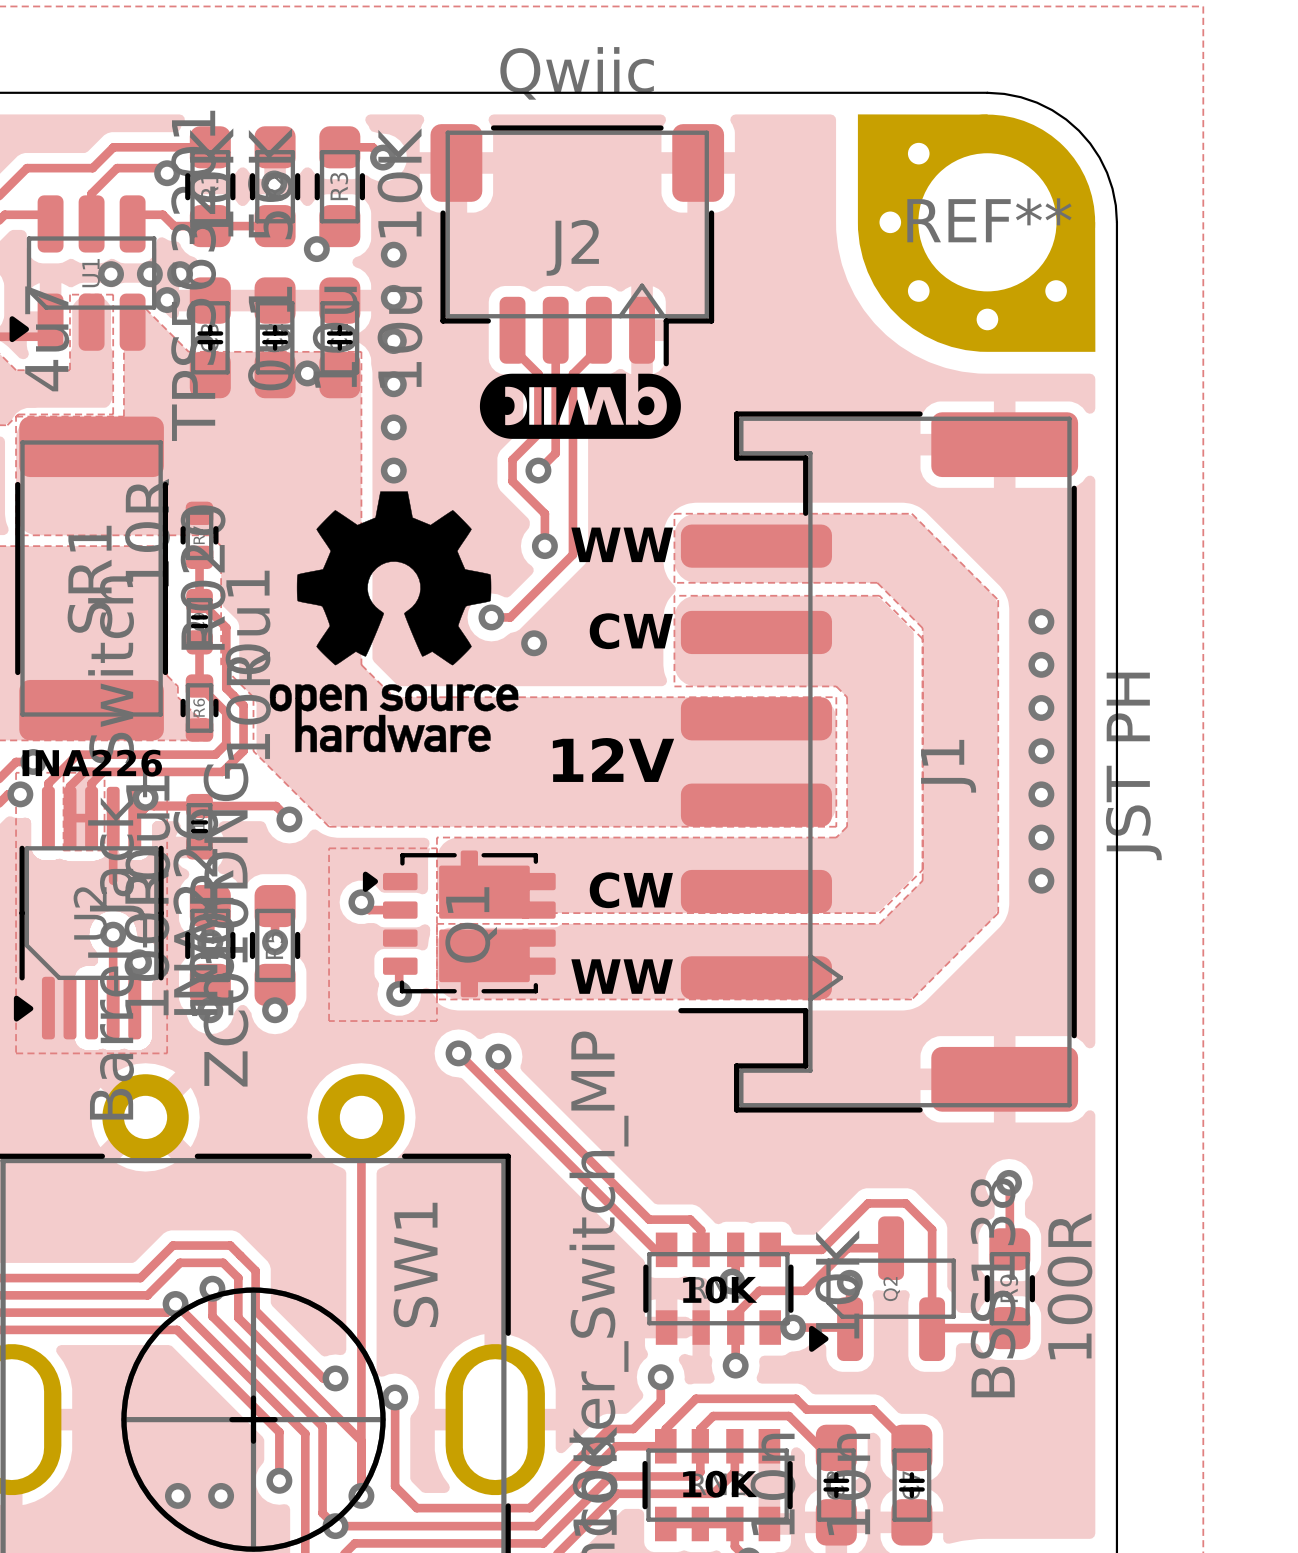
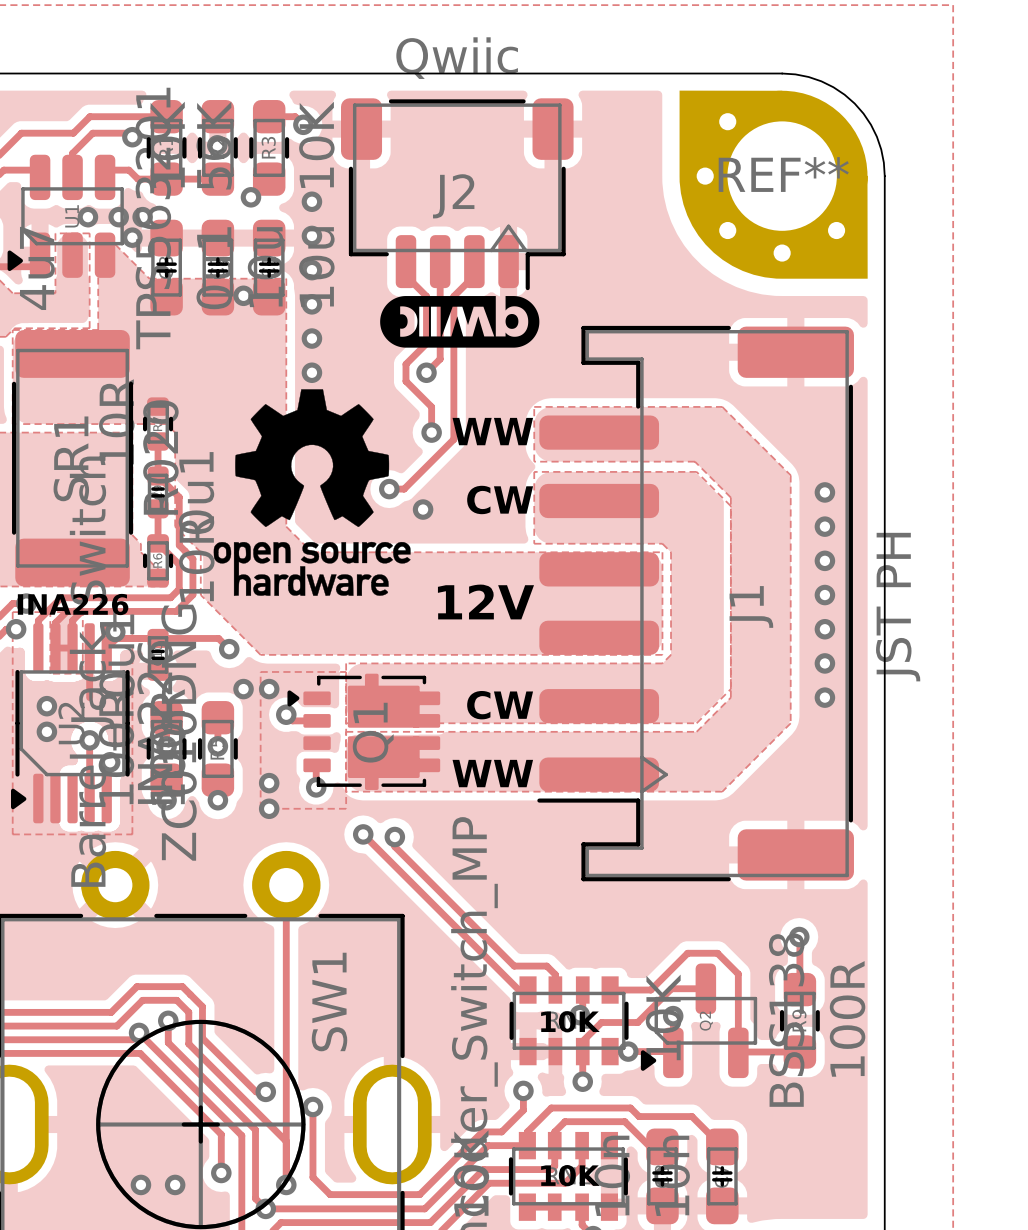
via: none -> (243, 689)
via: none -> (269, 689)
via: none -> (46, 706)
via: none -> (46, 731)
via: none -> (269, 783)
via: none -> (269, 808)

